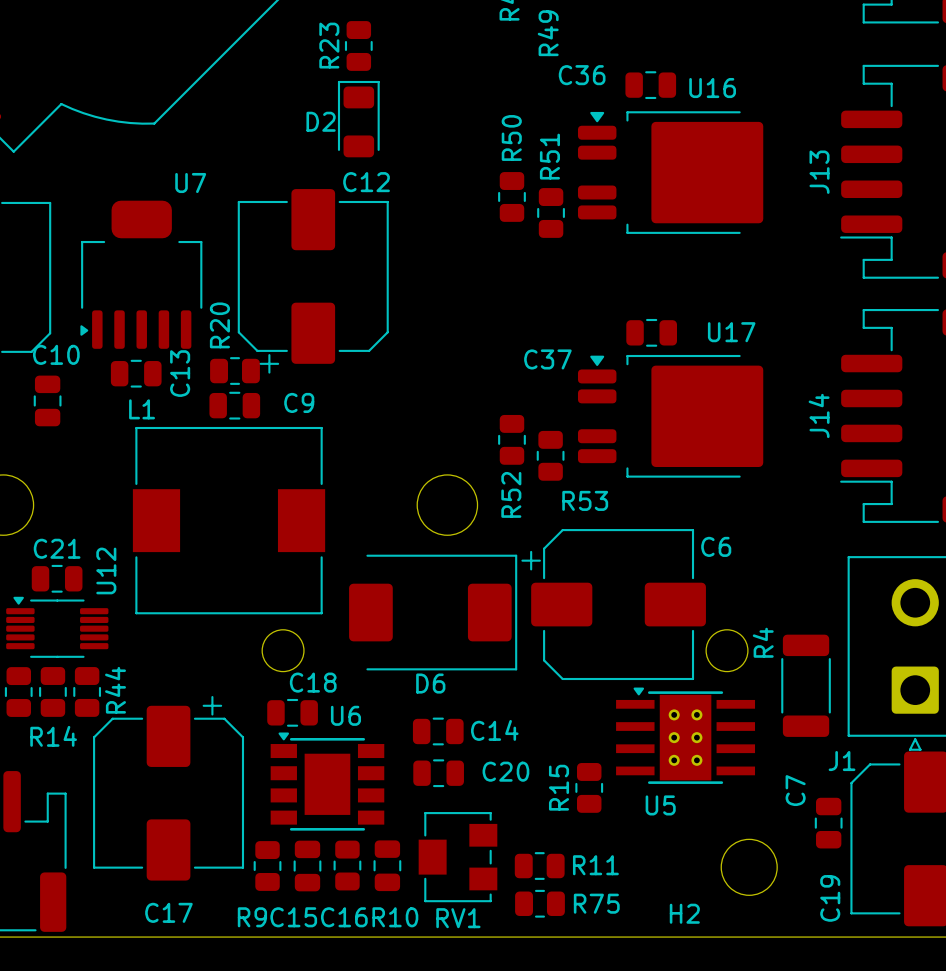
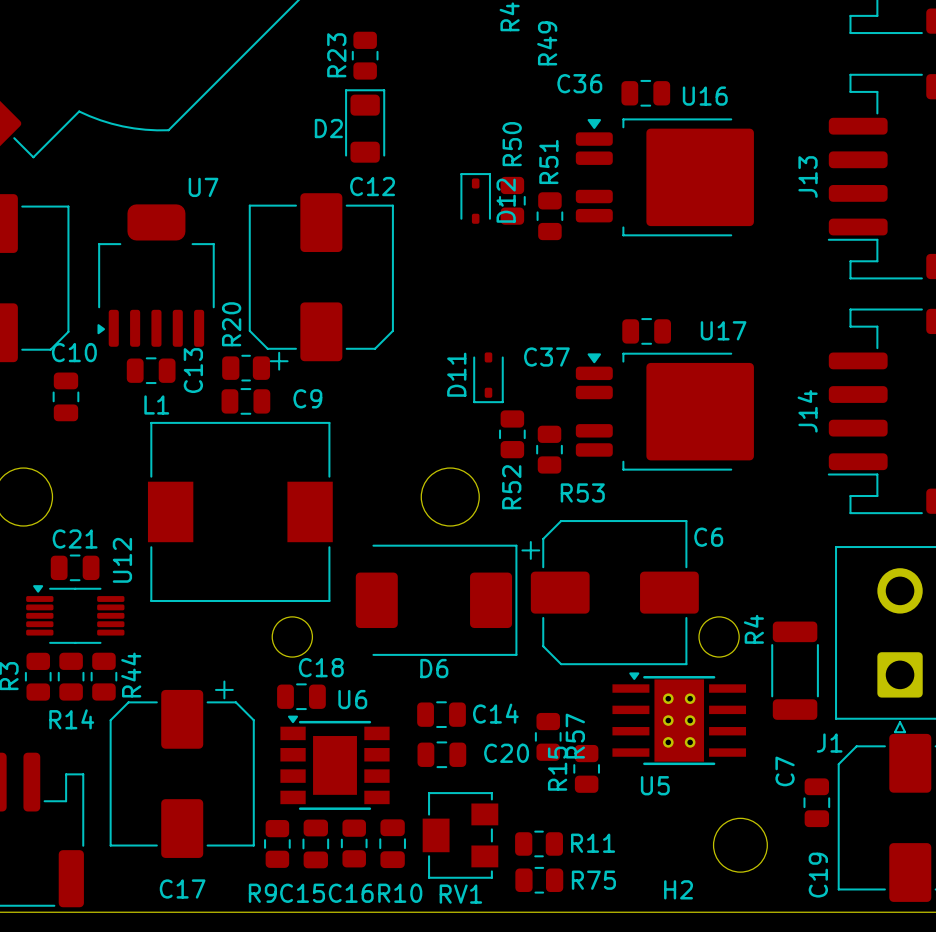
D12: none -> (475, 198)
D11: none -> (488, 377)
R57: none -> (548, 736)

